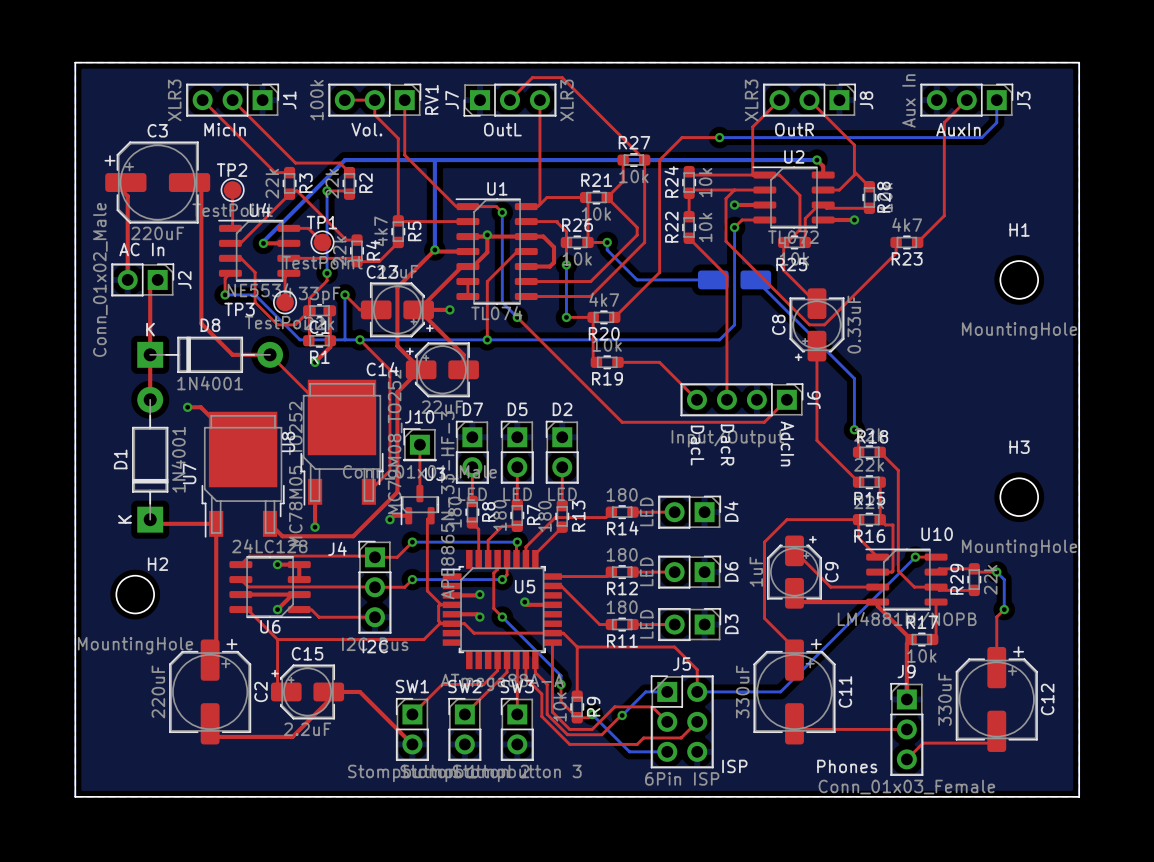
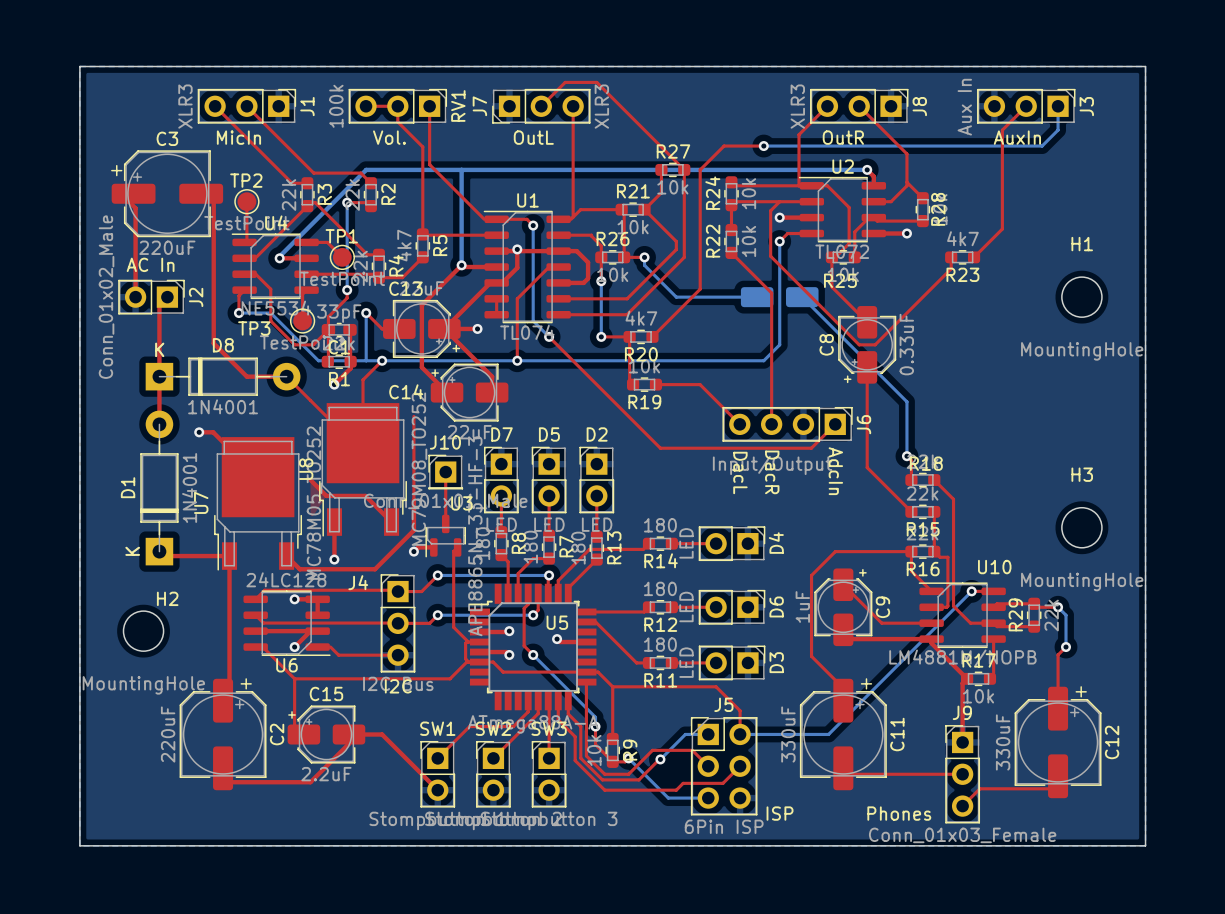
top track: (359, 339) (389, 369) (389, 392) -> (382, 360) (363, 379) (363, 443)
top track: (419, 369) (397, 392) (397, 492) (389, 499) -> none
top track: none -> (310, 480) (326, 495) (365, 495) (391, 522)
top track: (389, 470) (368, 491) -> (413, 499) (413, 530)

